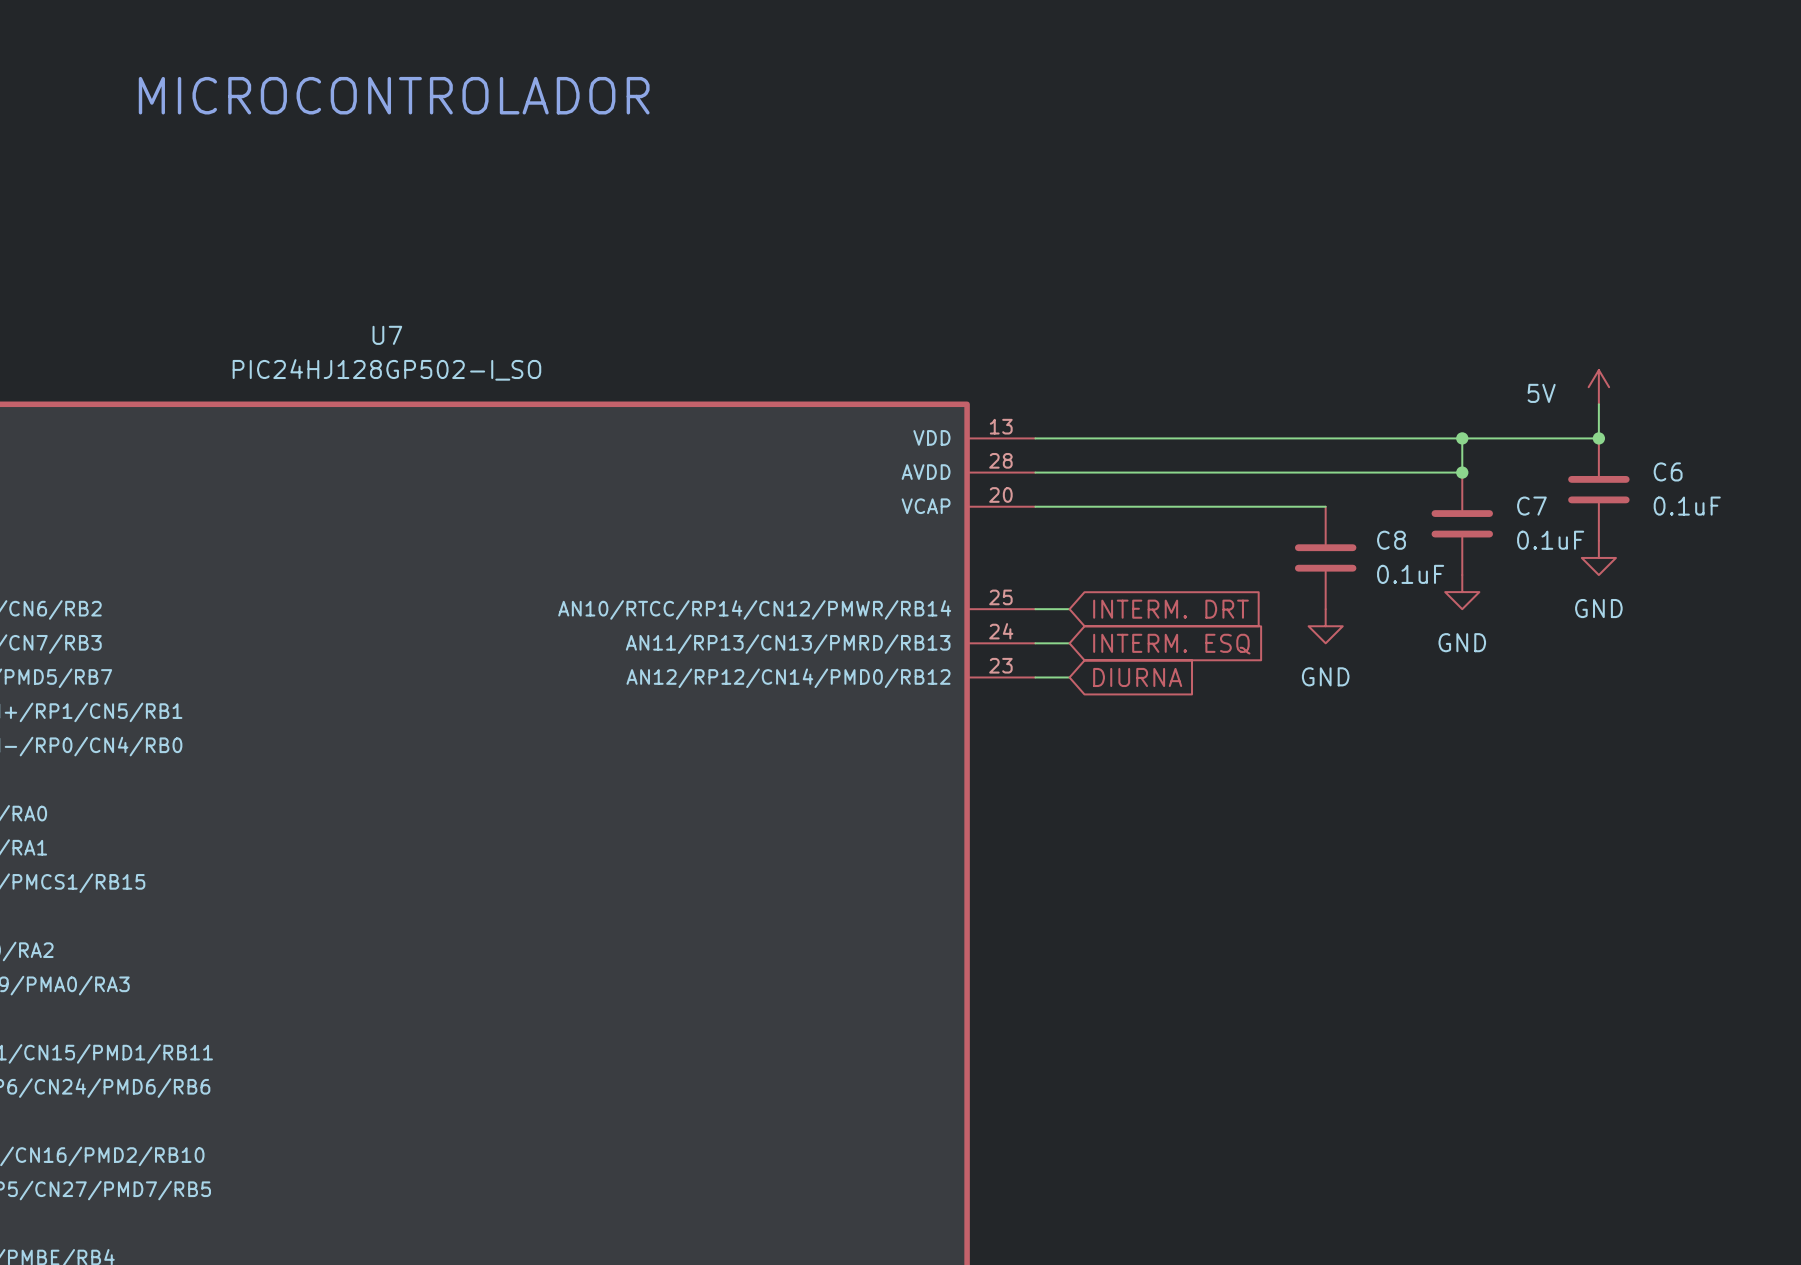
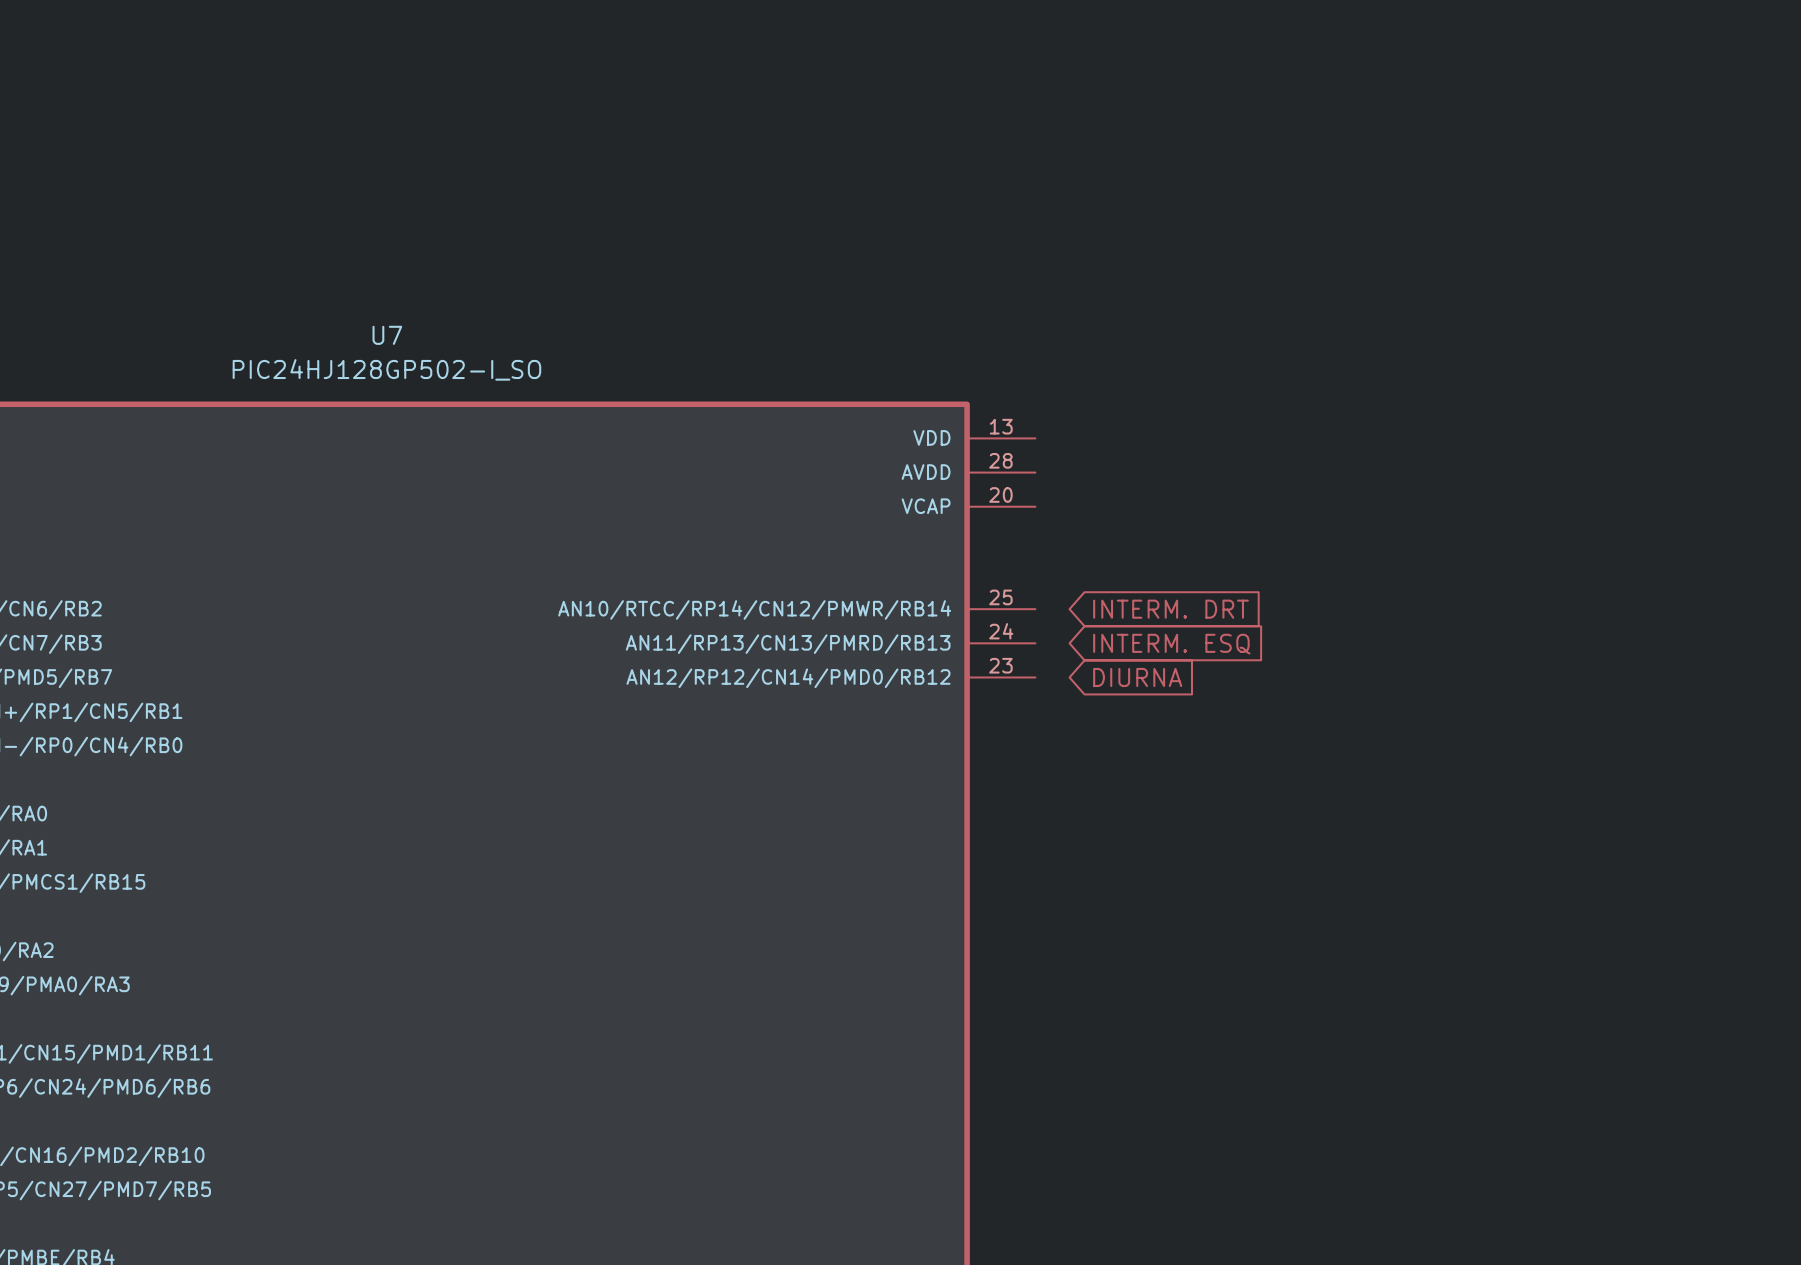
text: MICROCONTROLADOR (394, 95) -> none
power symbol: 5V (1598, 387) -> none
wire: (1598, 404) (1598, 438) (1035, 438) -> none
wire: (1462, 438) (1462, 472) (1035, 472) -> none
junction: (1462, 438) -> none
junction: (1598, 438) -> none
junction: (1462, 472) -> none
C6: 0.1uF (1598, 489) -> none
wire: (1035, 506) (1325, 506) -> none
C7: 0.1uF (1462, 523) -> none
C8: 0.1uF (1325, 557) -> none
power symbol: GND (1598, 557) -> none
power symbol: GND (1462, 592) -> none
wire: (1035, 609) (1069, 609) -> none
power symbol: GND (1325, 626) -> none
wire: (1035, 643) (1069, 643) -> none
wire: (1035, 677) (1069, 677) -> none

